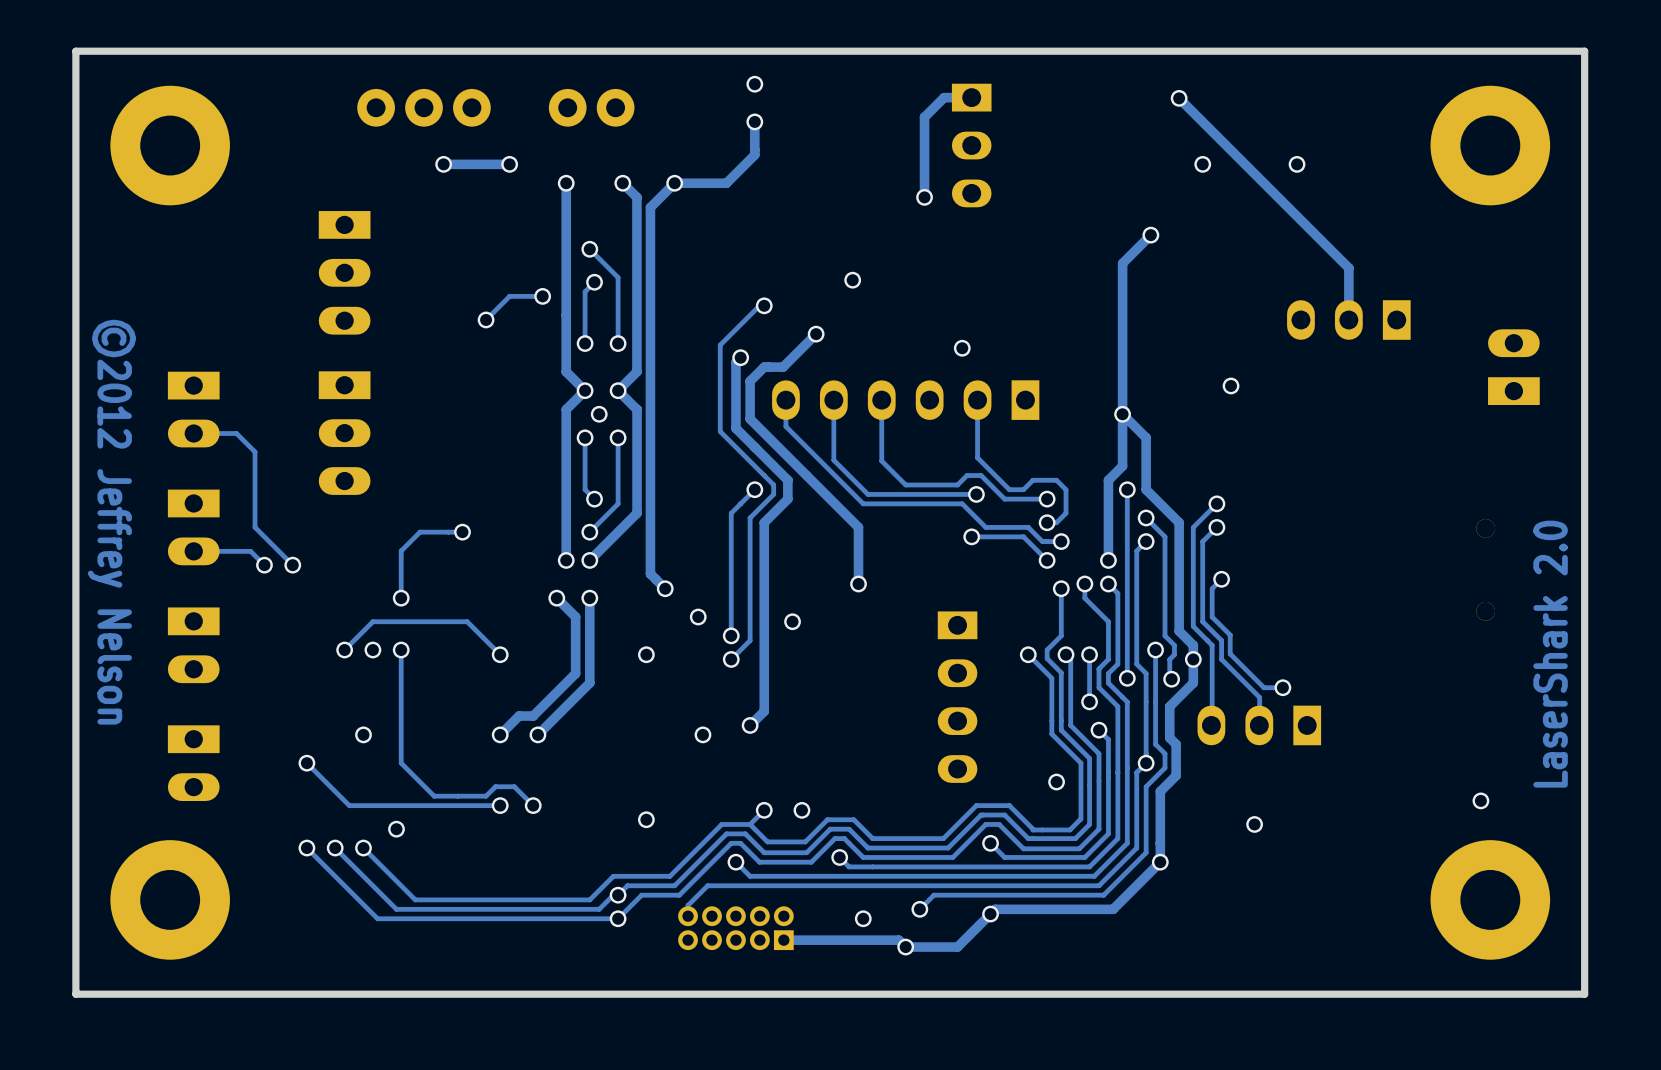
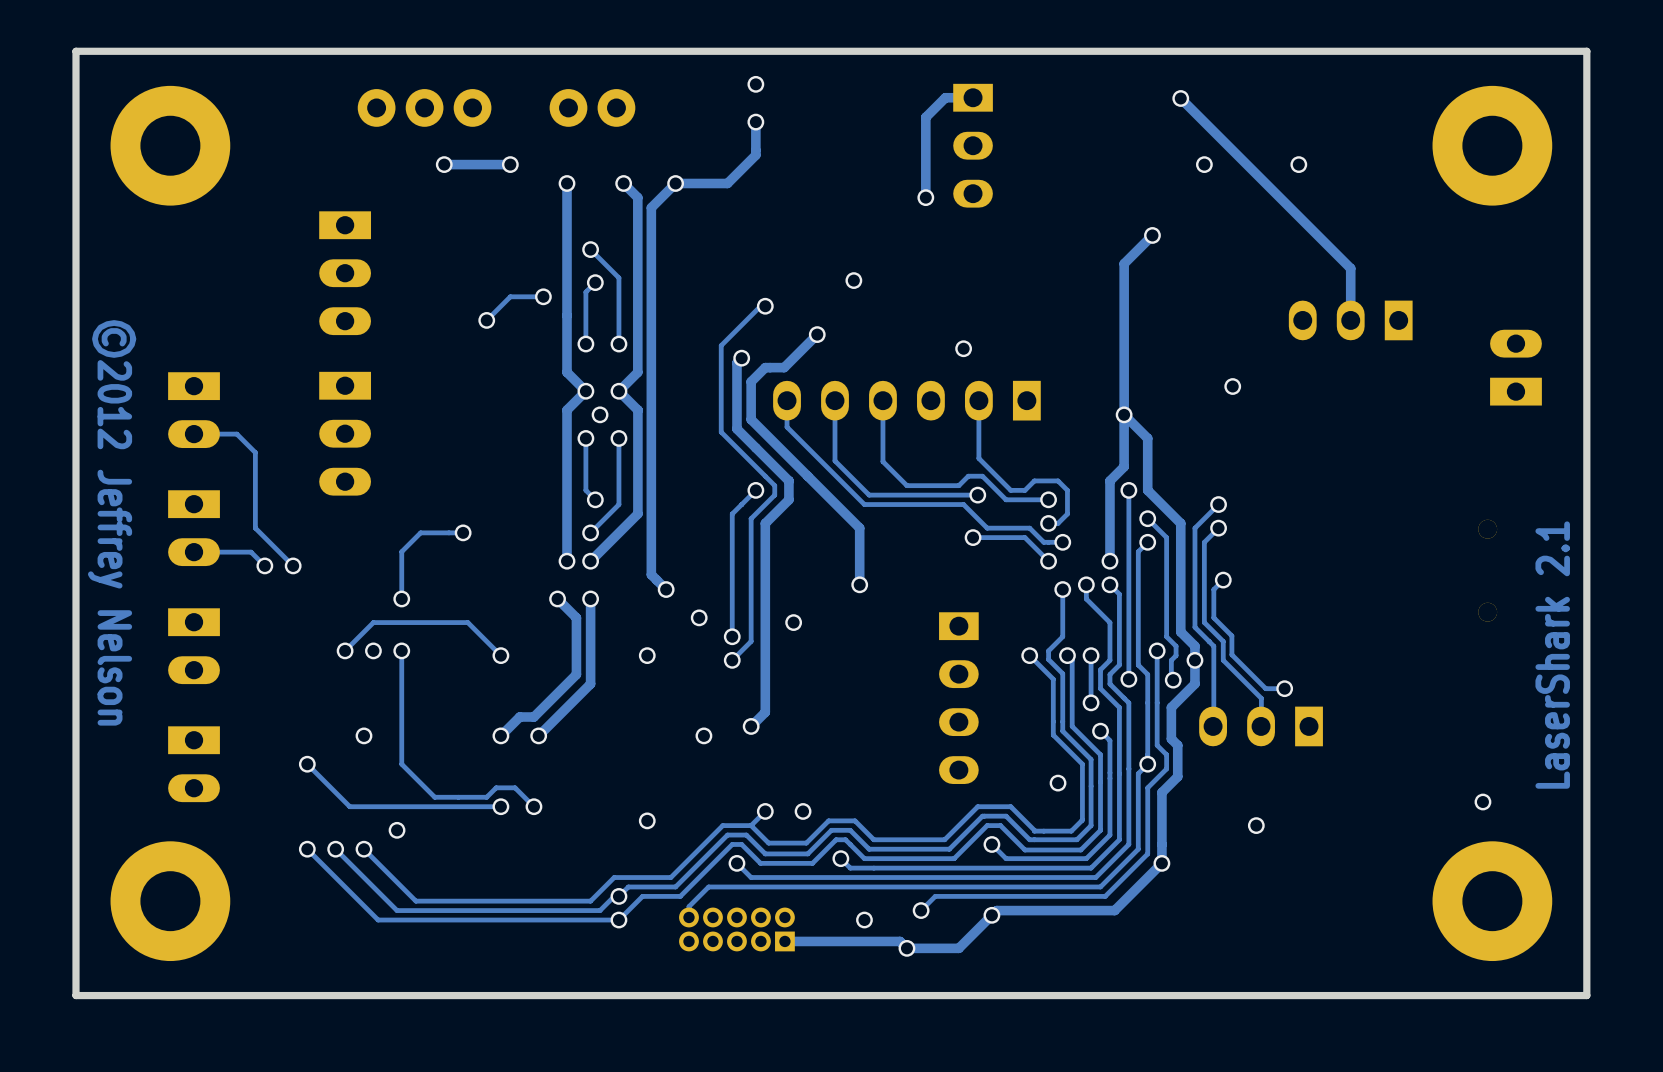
text: LaserShark 2.0 (1550, 654) -> LaserShark 2.1 (1552, 655)

